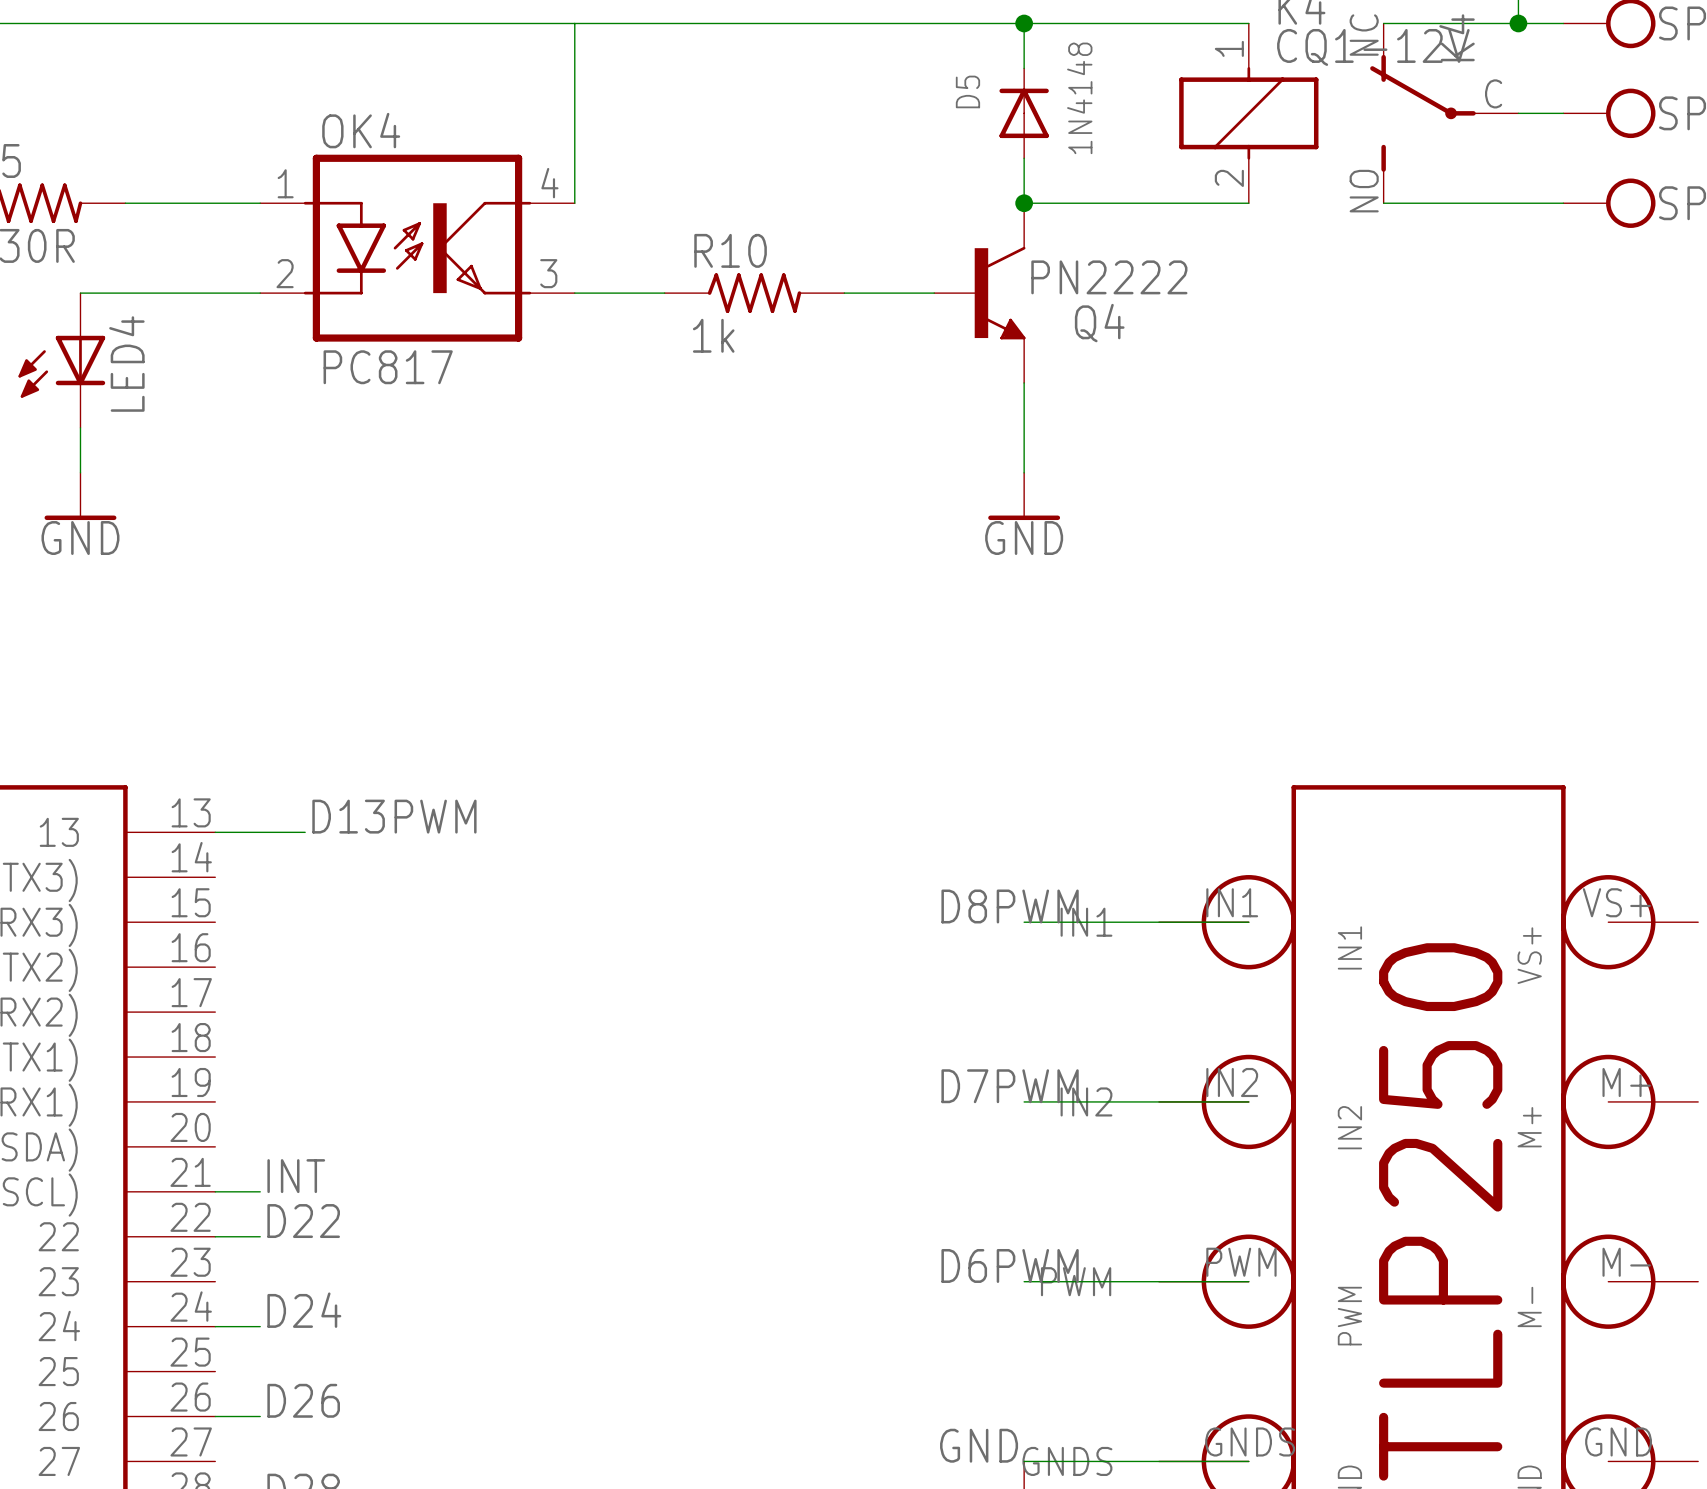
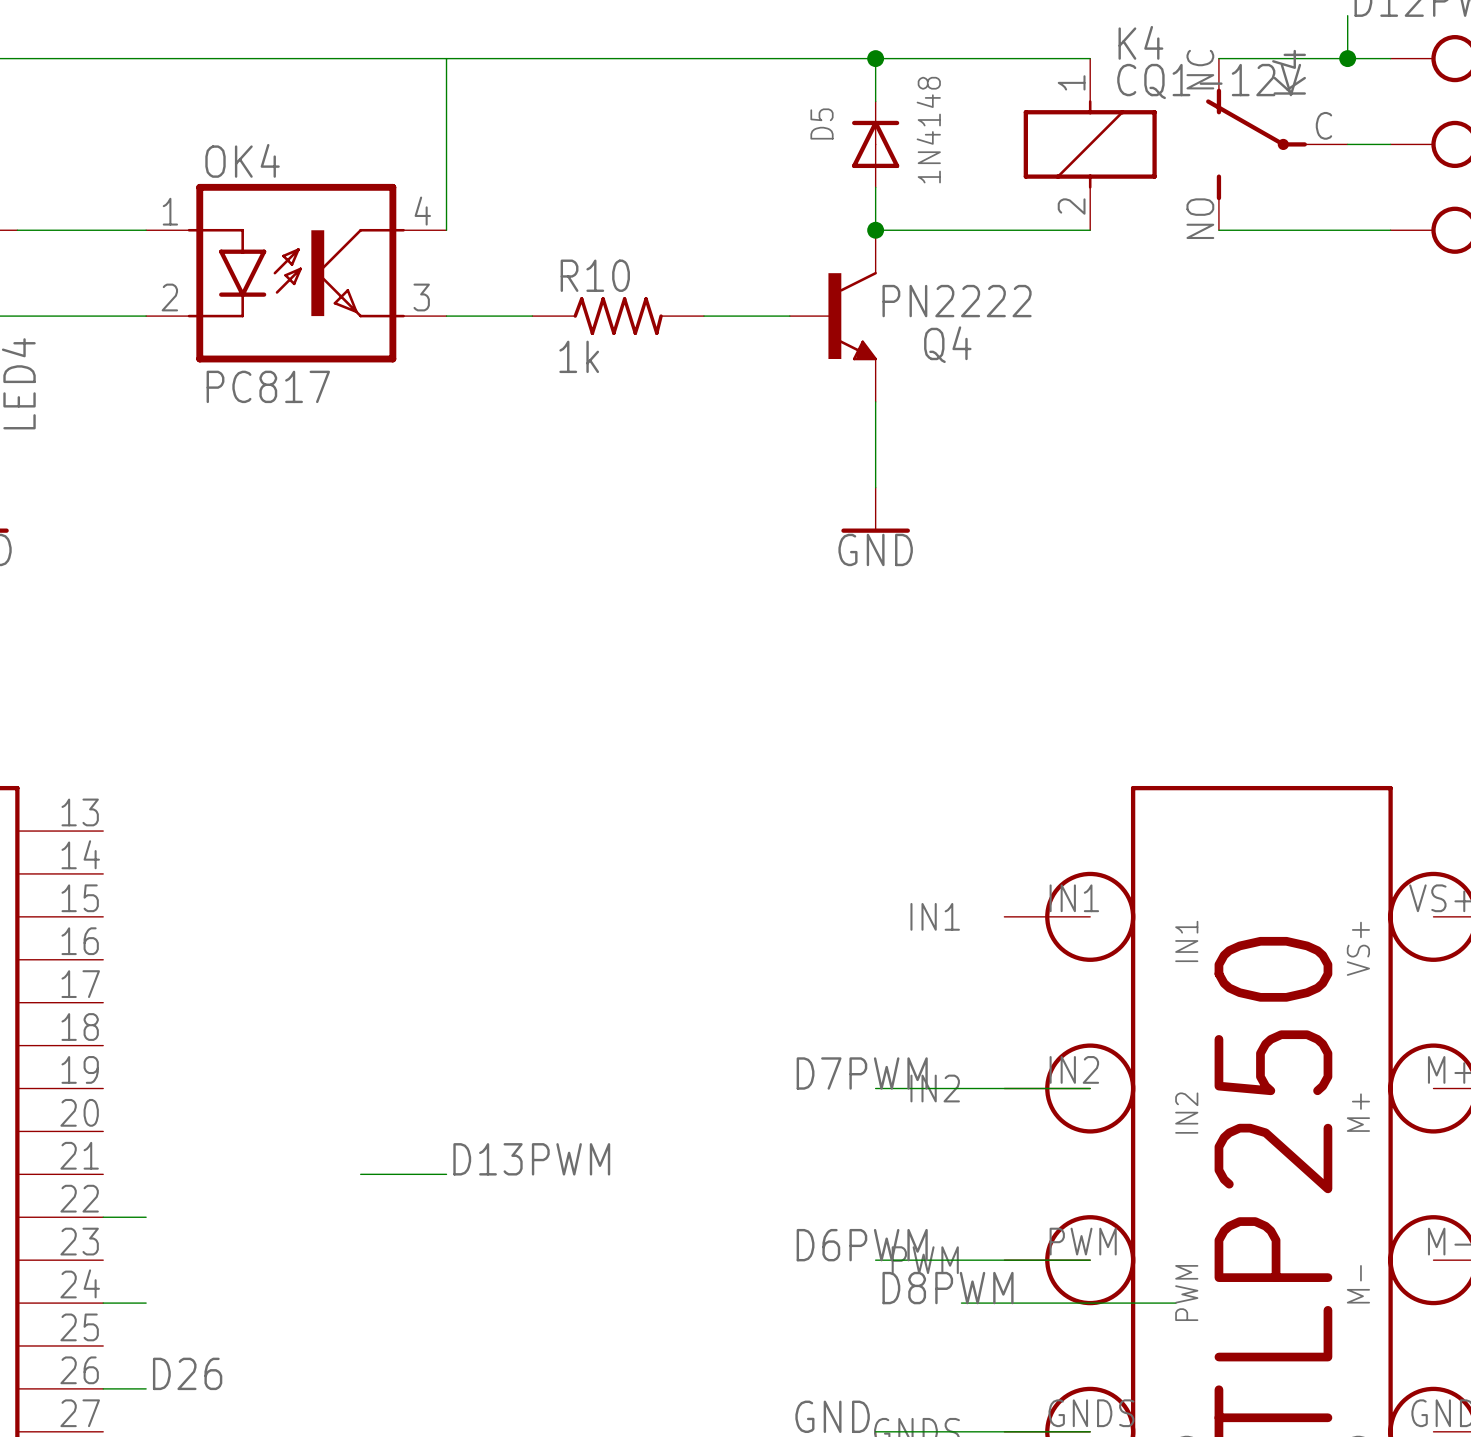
label: D13PWM (394, 816) -> none
wire: (215, 832) (305, 832) -> none
label position: D8PWM (1010, 906) -> D8PWM (948, 1288)
wire: (1024, 922) (1248, 922) -> (961, 1303) (1176, 1303)
label: INT (296, 1176) -> none
label: none -> D13PWM (531, 1159)
wire: (215, 1191) (260, 1191) -> none
wire: none -> (360, 1174) (446, 1174)
label: D22 (303, 1221) -> none
label: D24 (304, 1310) -> none

